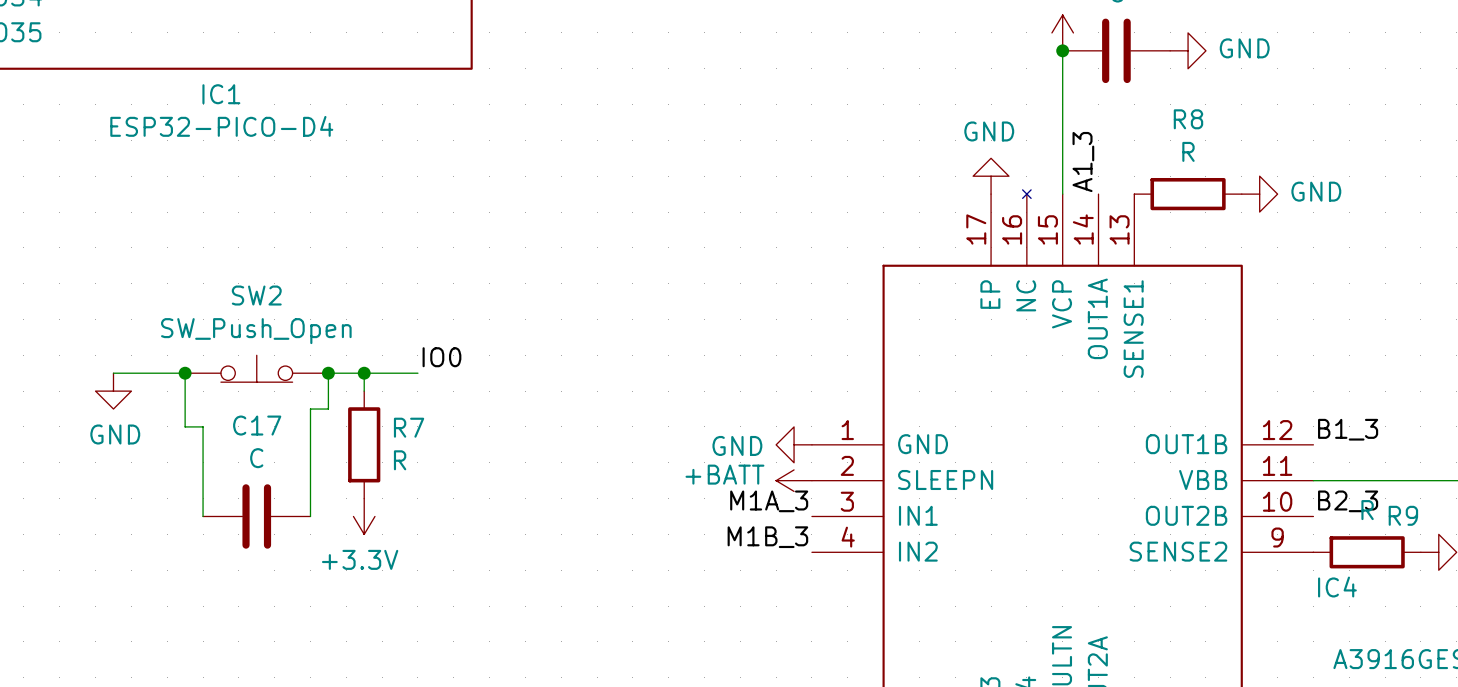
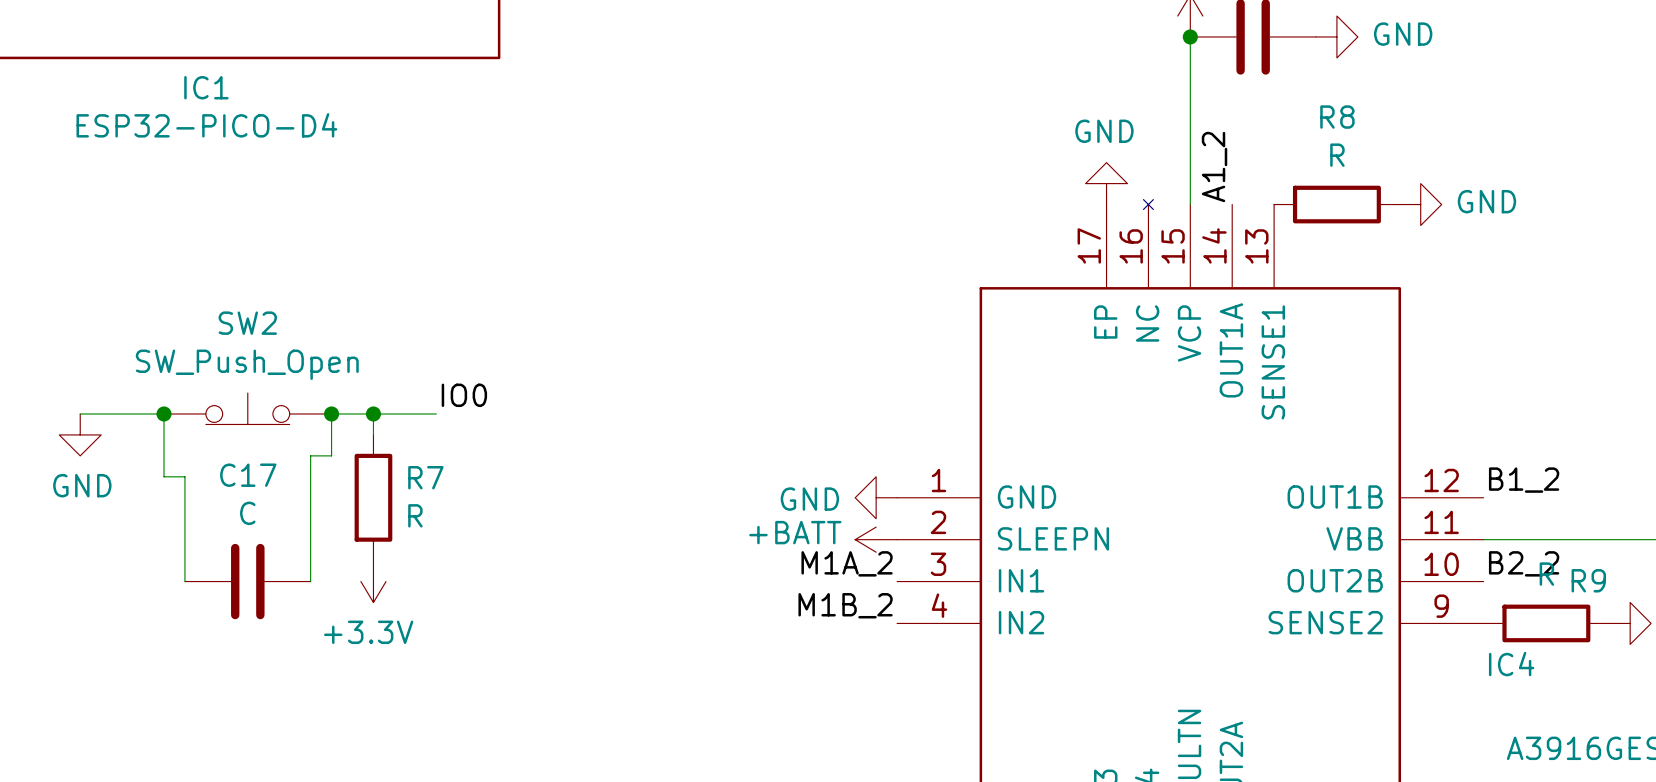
label: A1_3 (1083, 162) -> A1_2 (1214, 166)
label: B1_3 (1348, 429) -> B1_2 (1524, 480)
label: M1A_3 (769, 501) -> M1A_2 (847, 563)
label: B2_3 (1348, 501) -> B2_2 (1524, 563)
label: M1B_3 (767, 537) -> M1B_2 (845, 605)

